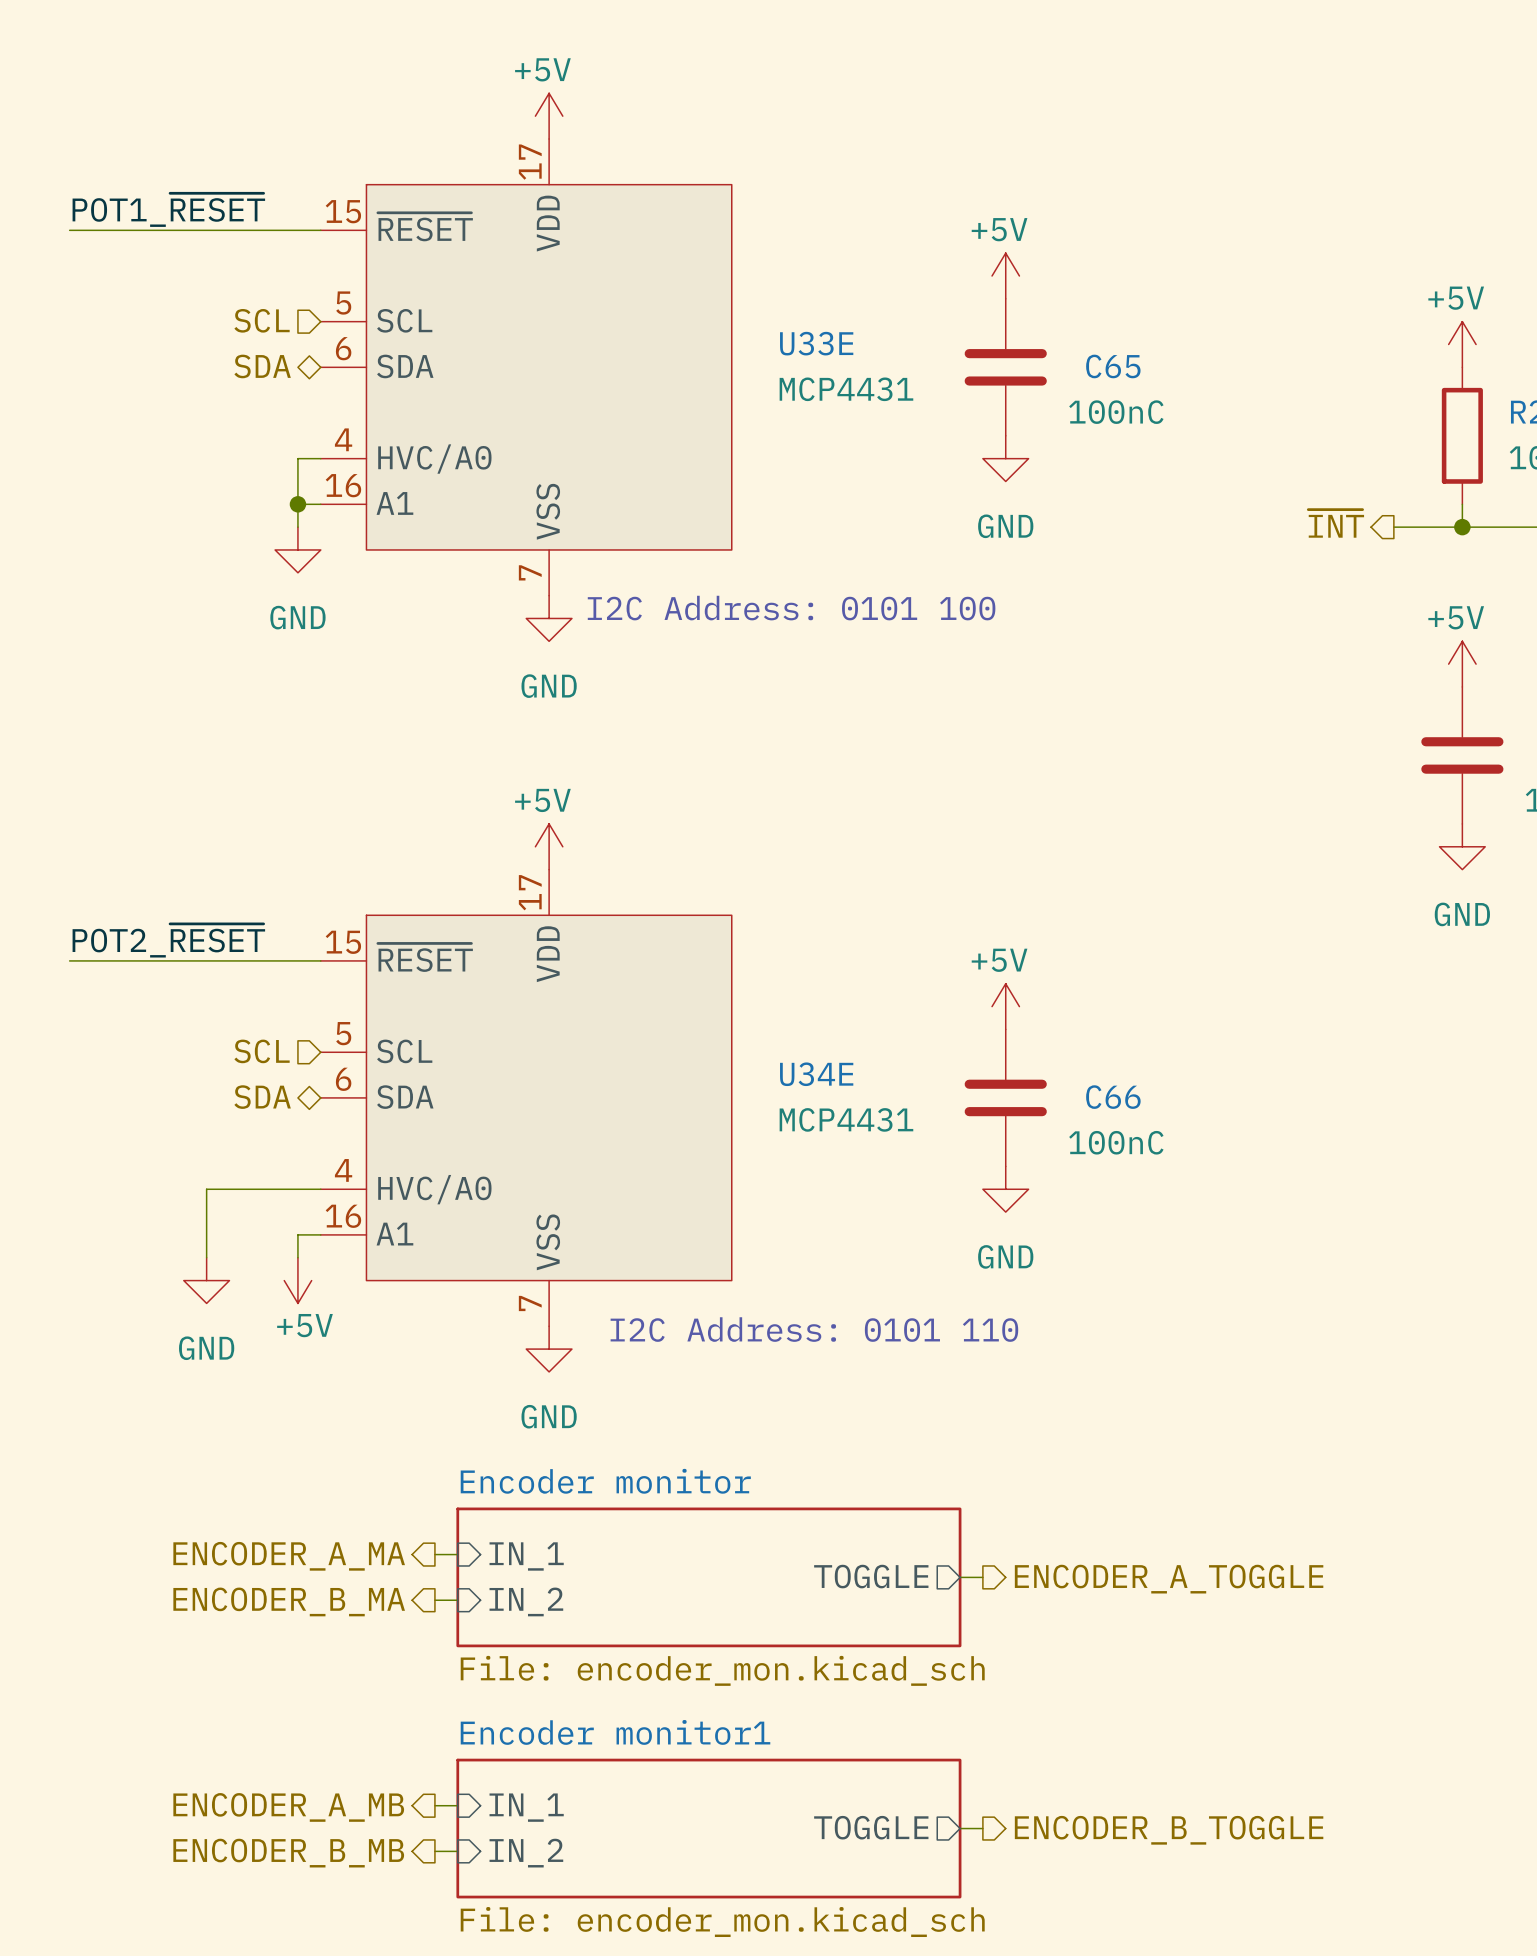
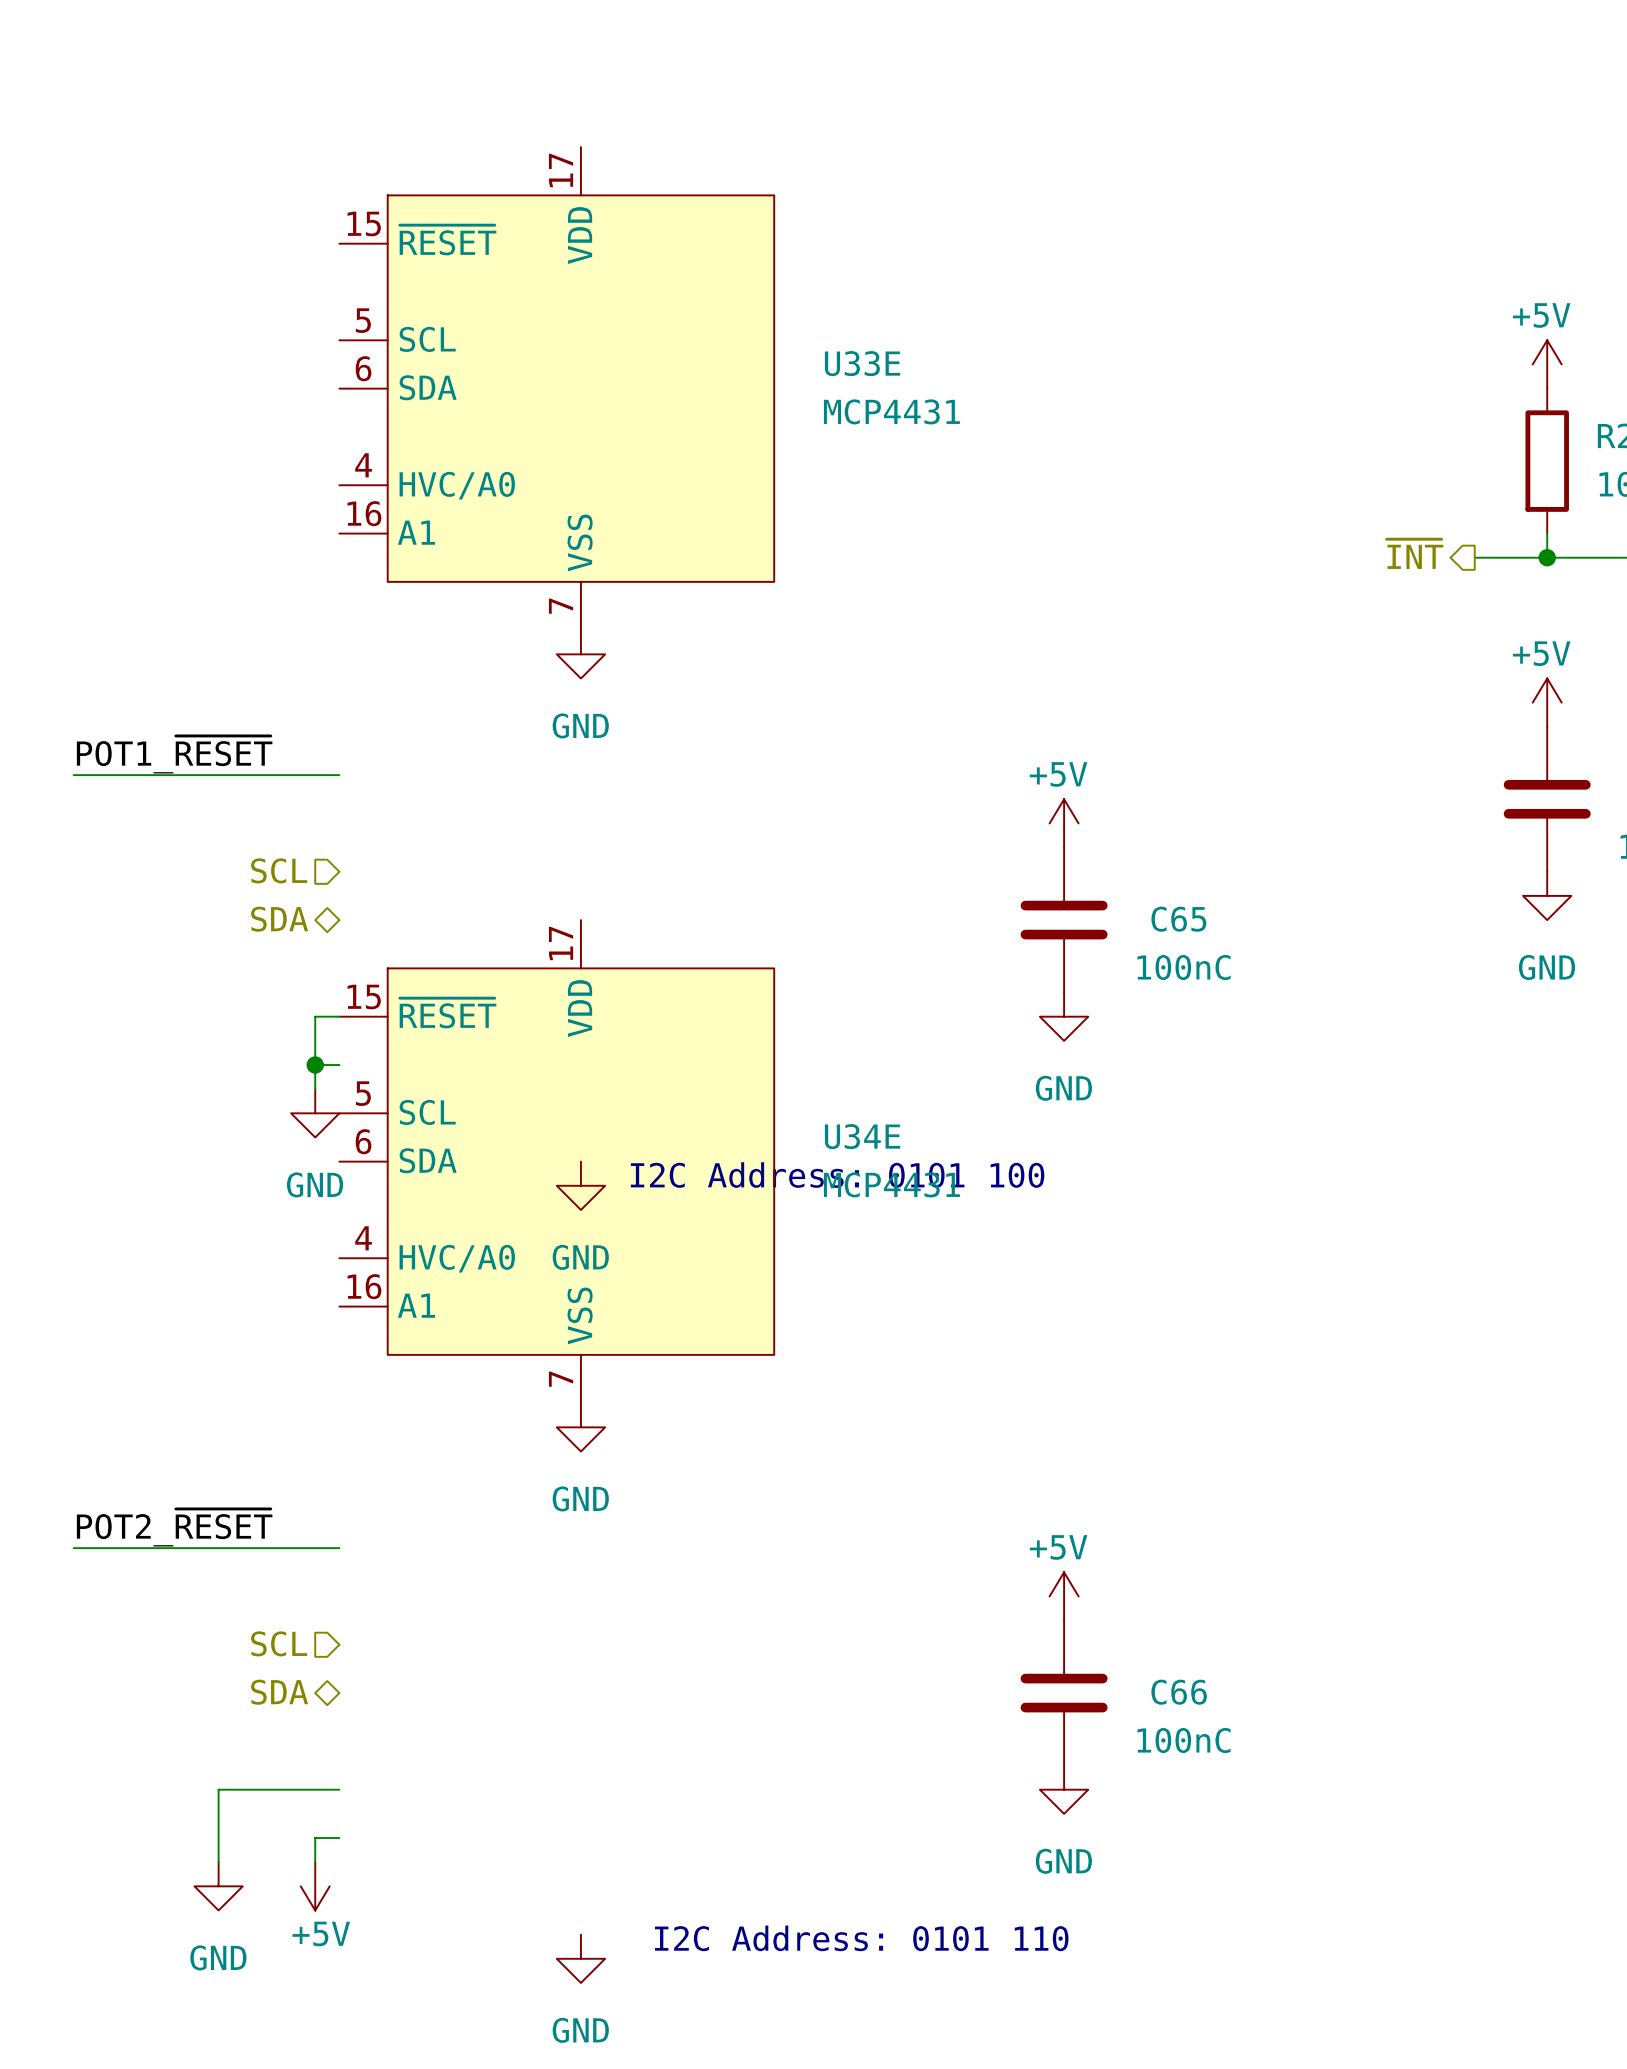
power symbol: +5V (549, 116) -> none
label: POT1_~{RESET} (168, 210) -> none
wire: (69, 230) (320, 230) -> none
power symbol: +5V (1005, 275) -> none
hierarchical label: SCL (262, 320) -> none
hierarchical label: SDA (262, 366) -> none
C65 position: (1005, 367) -> (1064, 920)
wire: (320, 458) (297, 458) (297, 527) -> none
power symbol: GND (1005, 458) -> none
wire: (297, 504) (320, 504) -> none
junction: (297, 504) -> none
power symbol: GND (297, 549) -> none
text: I2C Address: 0101 100 (791, 608) -> none
label: none -> POT1_~{RESET} (174, 754)
wire: none -> (73, 775) (339, 775)
power symbol: +5V (549, 846) -> none
label: POT2_~{RESET} (168, 940) -> none
wire: (69, 960) (297, 960) -> (315, 1089) (315, 1016)
wire: none -> (315, 1065) (339, 1065)
junction: none -> (315, 1065)
power symbol position: +5V (1005, 1006) -> +5V (1064, 823)
hierarchical label position: SCL (262, 1051) -> SCL (279, 870)
power symbol: none -> GND (315, 1113)
hierarchical label position: SDA (262, 1097) -> SDA (279, 919)
C66 position: (1005, 1097) -> (1064, 1693)
text: none -> I2C Address: 0101 100 (837, 1175)
power symbol: none -> GND (580, 1185)
wire: (320, 1189) (206, 1189) (206, 1257) -> none
power symbol position: GND (1005, 1189) -> GND (1064, 1016)
wire: (320, 1234) (297, 1234) (297, 1257) -> none
power symbol: GND (206, 1280) -> none
power symbol: +5V (297, 1280) -> none
text: I2C Address: 0101 110 (814, 1329) -> none
label: none -> POT2_~{RESET} (174, 1527)
wire: none -> (73, 1548) (339, 1548)
power symbol: none -> +5V (1064, 1596)
hierarchical label: none -> SCL (279, 1643)
wire: (434, 1554) (457, 1554) -> none
hierarchical label: ENCODER_A_MA (289, 1556) -> none
sheet pin: IN_1 (526, 1556) -> none
sheet pin: TOGGLE (871, 1576) -> none
sheet Encoder monitor: File: encoder_mon.kicad_sch (708, 1577) -> none
wire: (960, 1577) (982, 1577) -> none
hierarchical label: ENCODER_A_TOGGLE (1169, 1579) -> none
hierarchical label: none -> SDA (279, 1692)
wire: (434, 1600) (457, 1600) -> none
hierarchical label: ENCODER_B_MA (289, 1601) -> none
sheet pin: IN_2 (526, 1601) -> none
wire: none -> (339, 1789) (218, 1789) (218, 1862)
power symbol: none -> GND (1064, 1789)
wire: none -> (339, 1838) (315, 1838) (315, 1862)
power symbol: none -> GND (218, 1886)
power symbol: none -> +5V (315, 1886)
wire: (434, 1805) (457, 1805) -> none
hierarchical label: ENCODER_A_MB (288, 1807) -> none
sheet pin: IN_1 (526, 1807) -> none
sheet pin: TOGGLE (871, 1827) -> none
sheet Encoder monitor1: File: encoder_mon.kicad_sch (708, 1828) -> none
wire: (960, 1828) (982, 1828) -> none
hierarchical label: ENCODER_B_TOGGLE (1169, 1830) -> none
text: none -> I2C Address: 0101 110 (861, 1938)
wire: (434, 1851) (457, 1851) -> none
power symbol: none -> GND (580, 1958)
hierarchical label: ENCODER_B_MB (288, 1853) -> none
sheet pin: IN_2 (526, 1853) -> none

